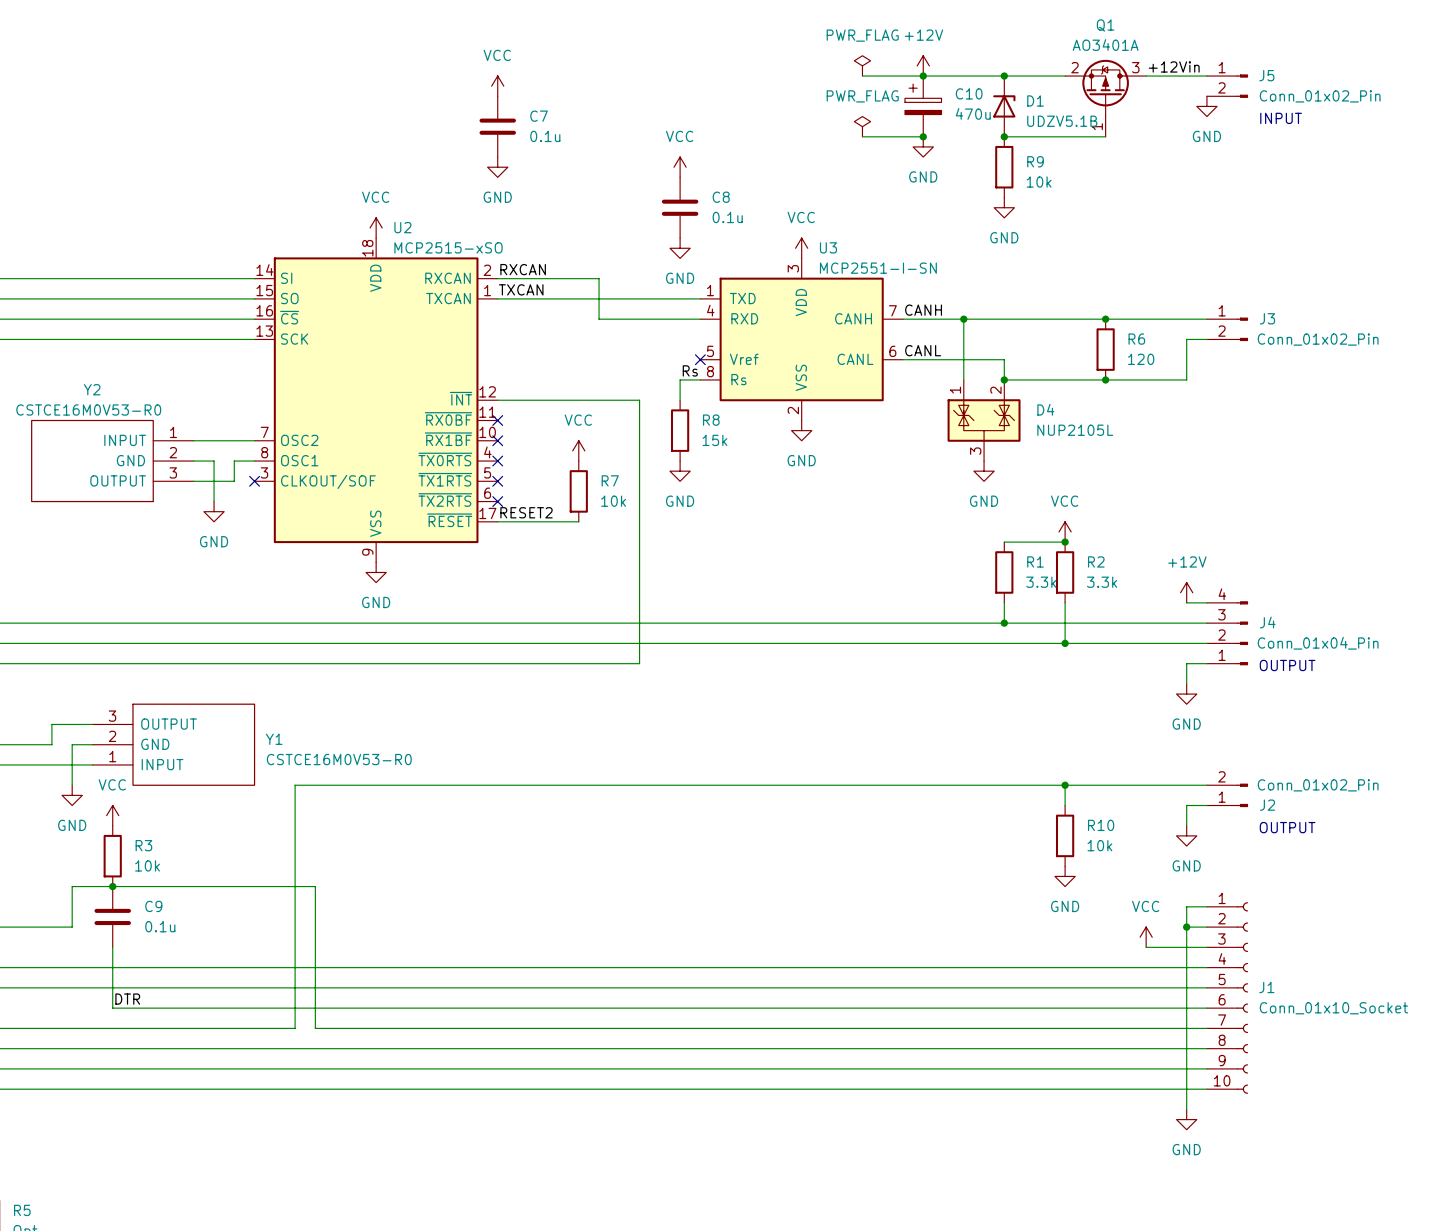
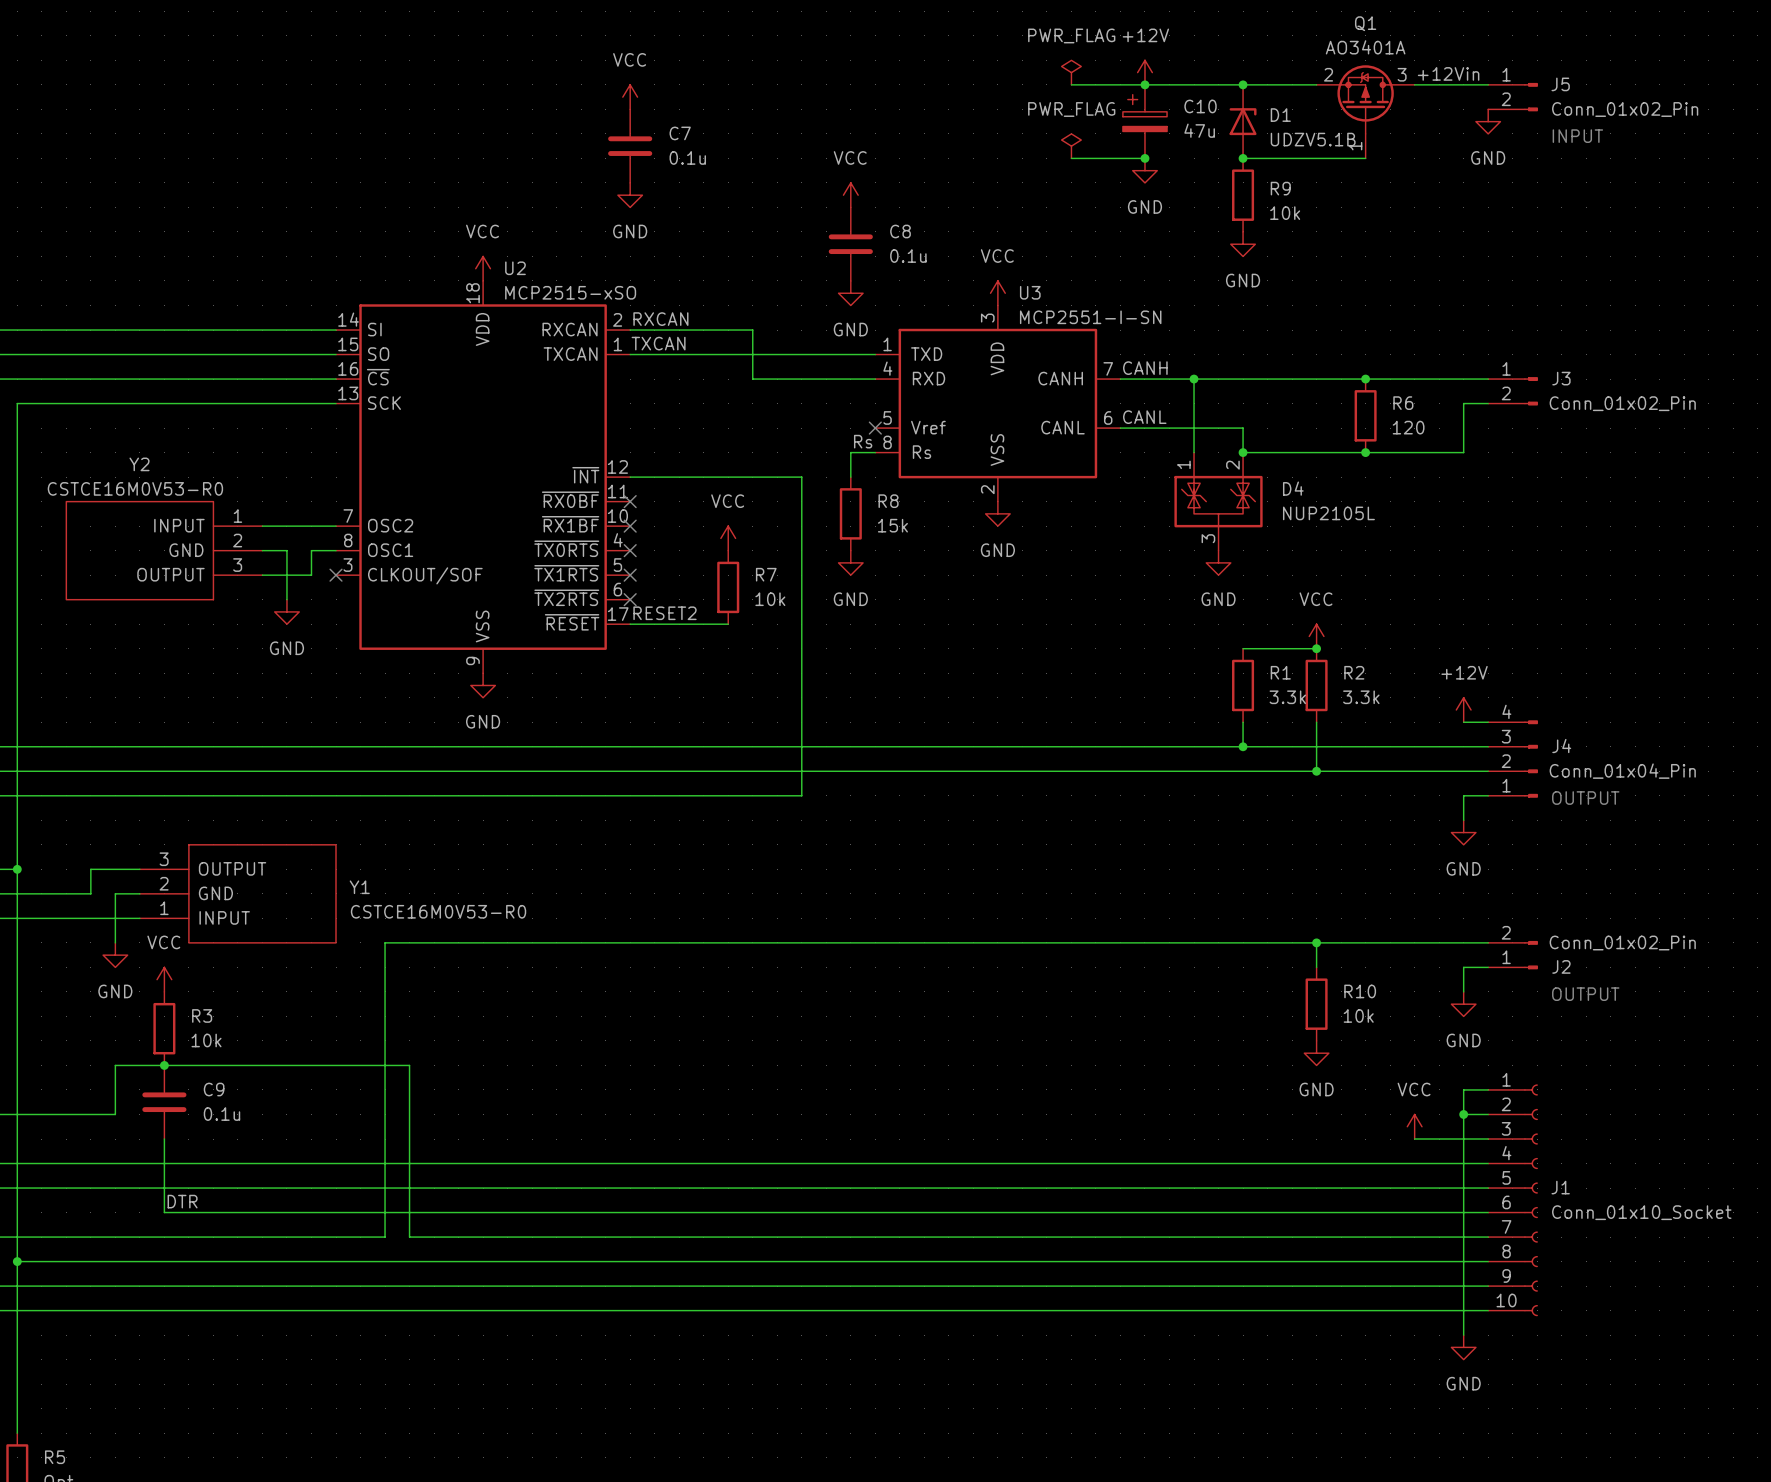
C10 value: 470u (973, 113) -> 47u (1199, 130)

